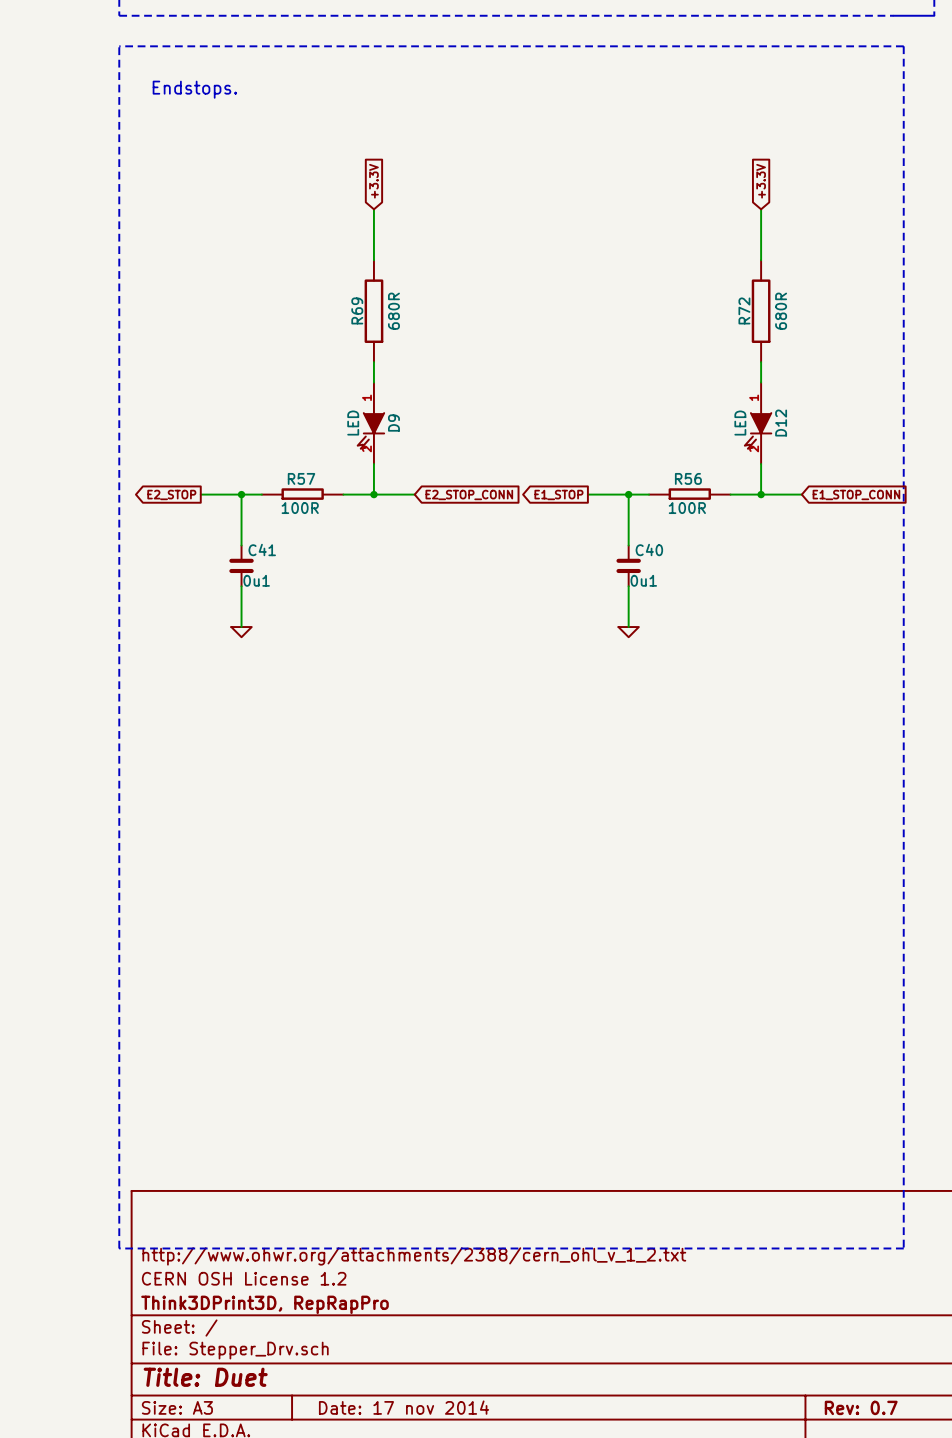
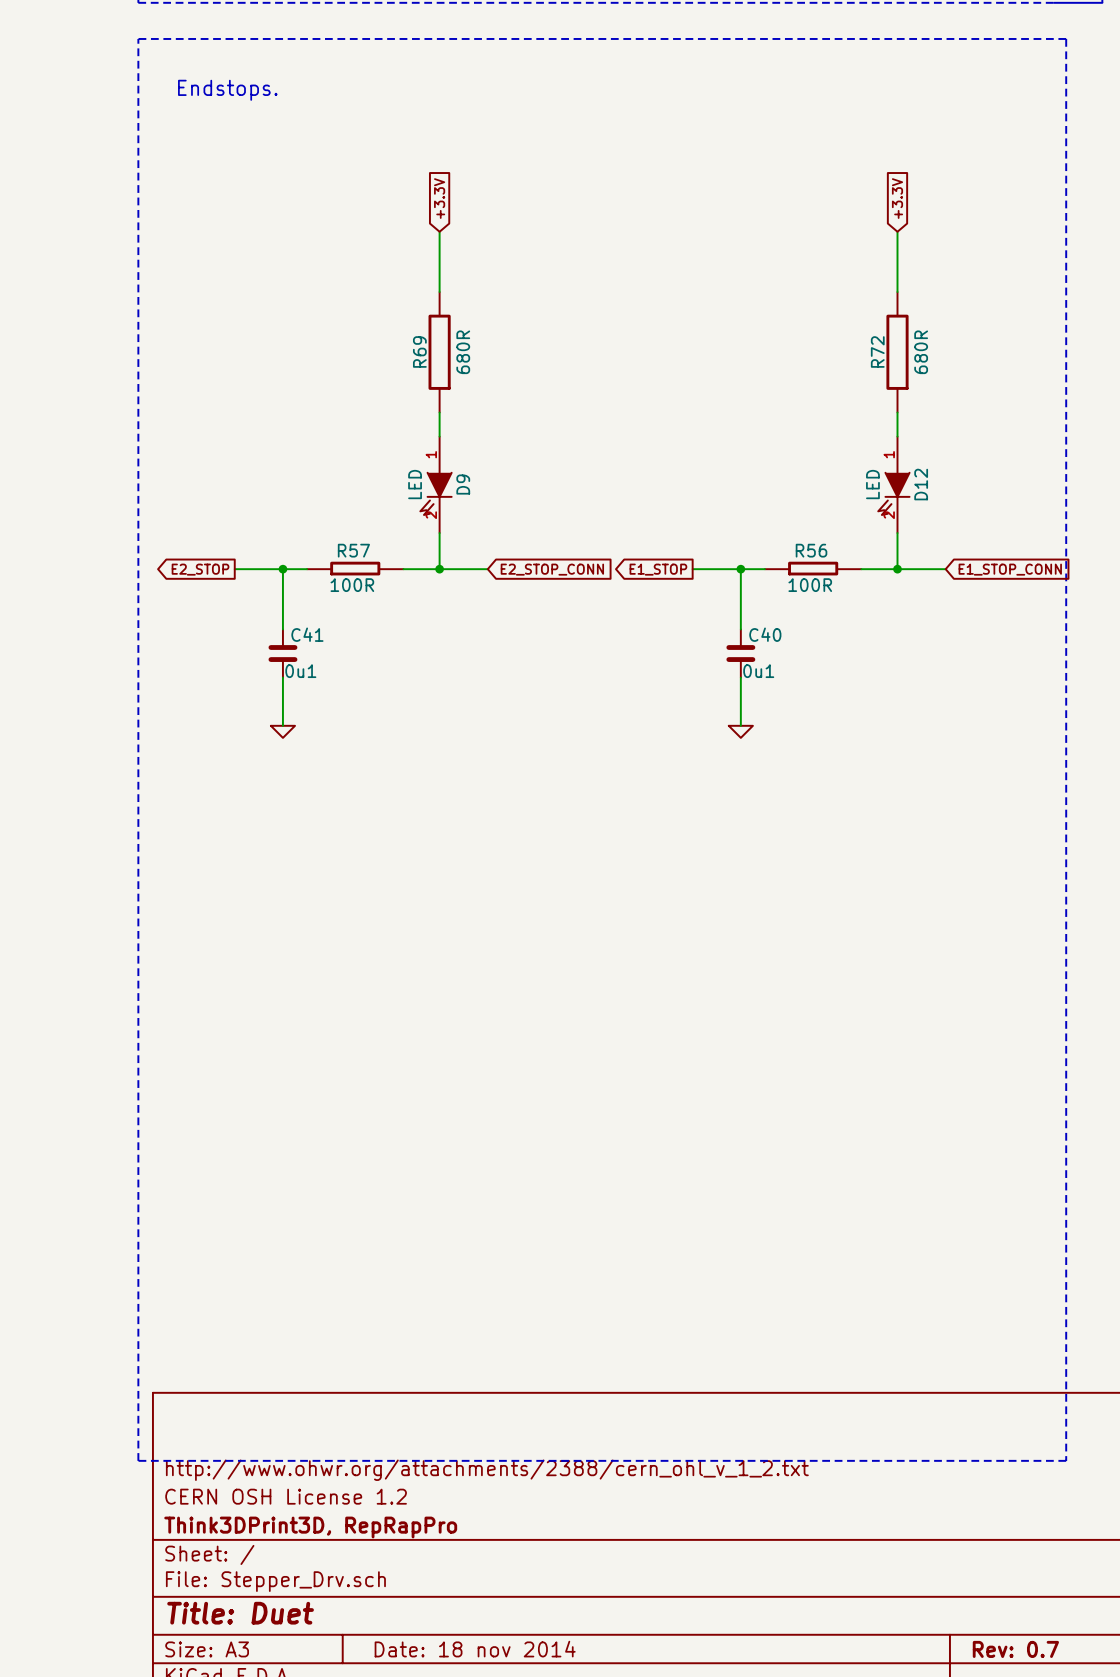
title block: Date: 17 nov 2014 (404, 1407) -> Date: 18 nov 2014 (475, 1649)

